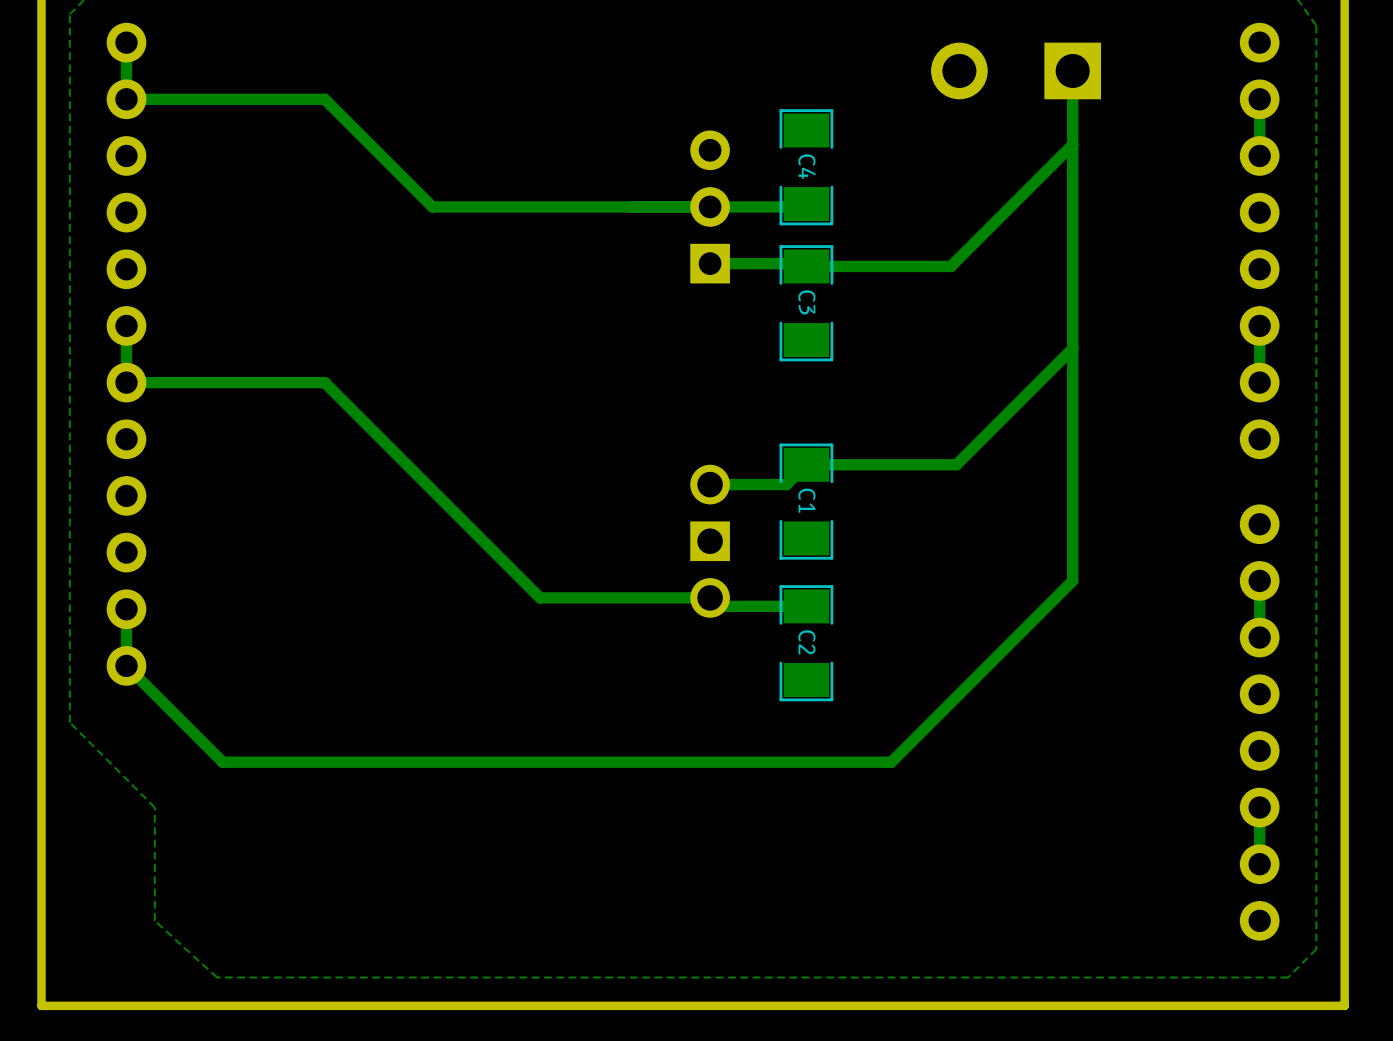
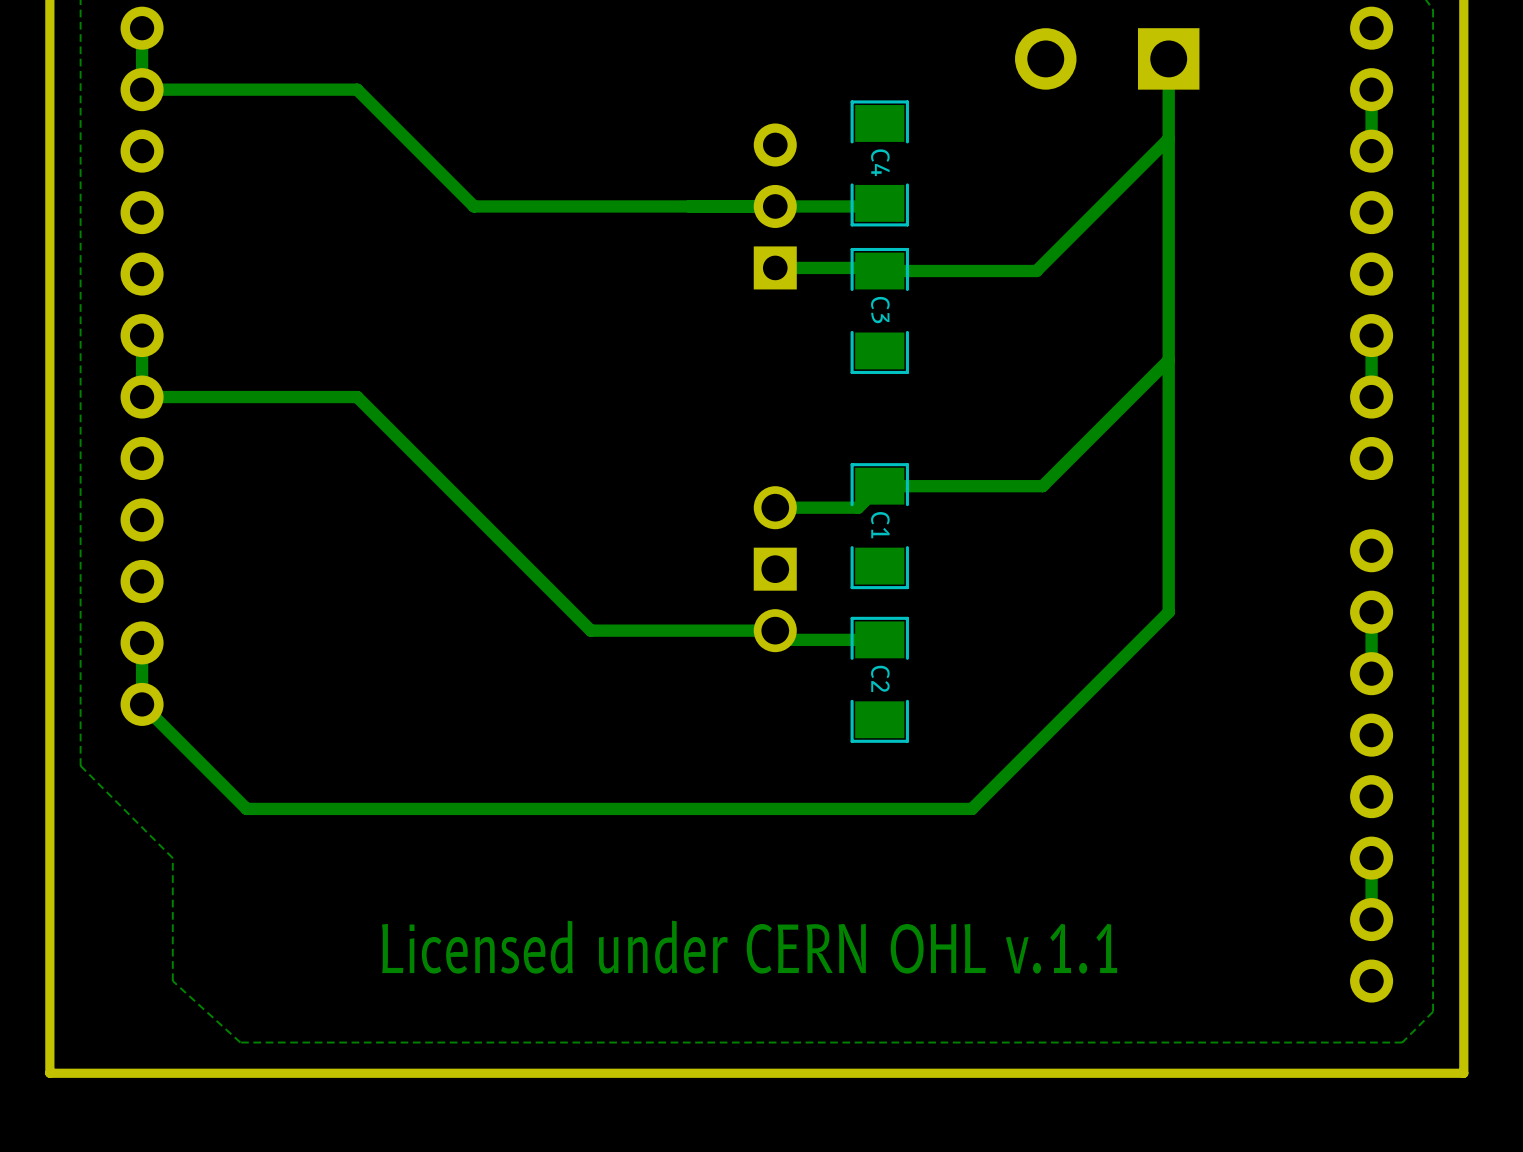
text: none -> Licensed under CERN OHL v.1.1 (749, 947)

